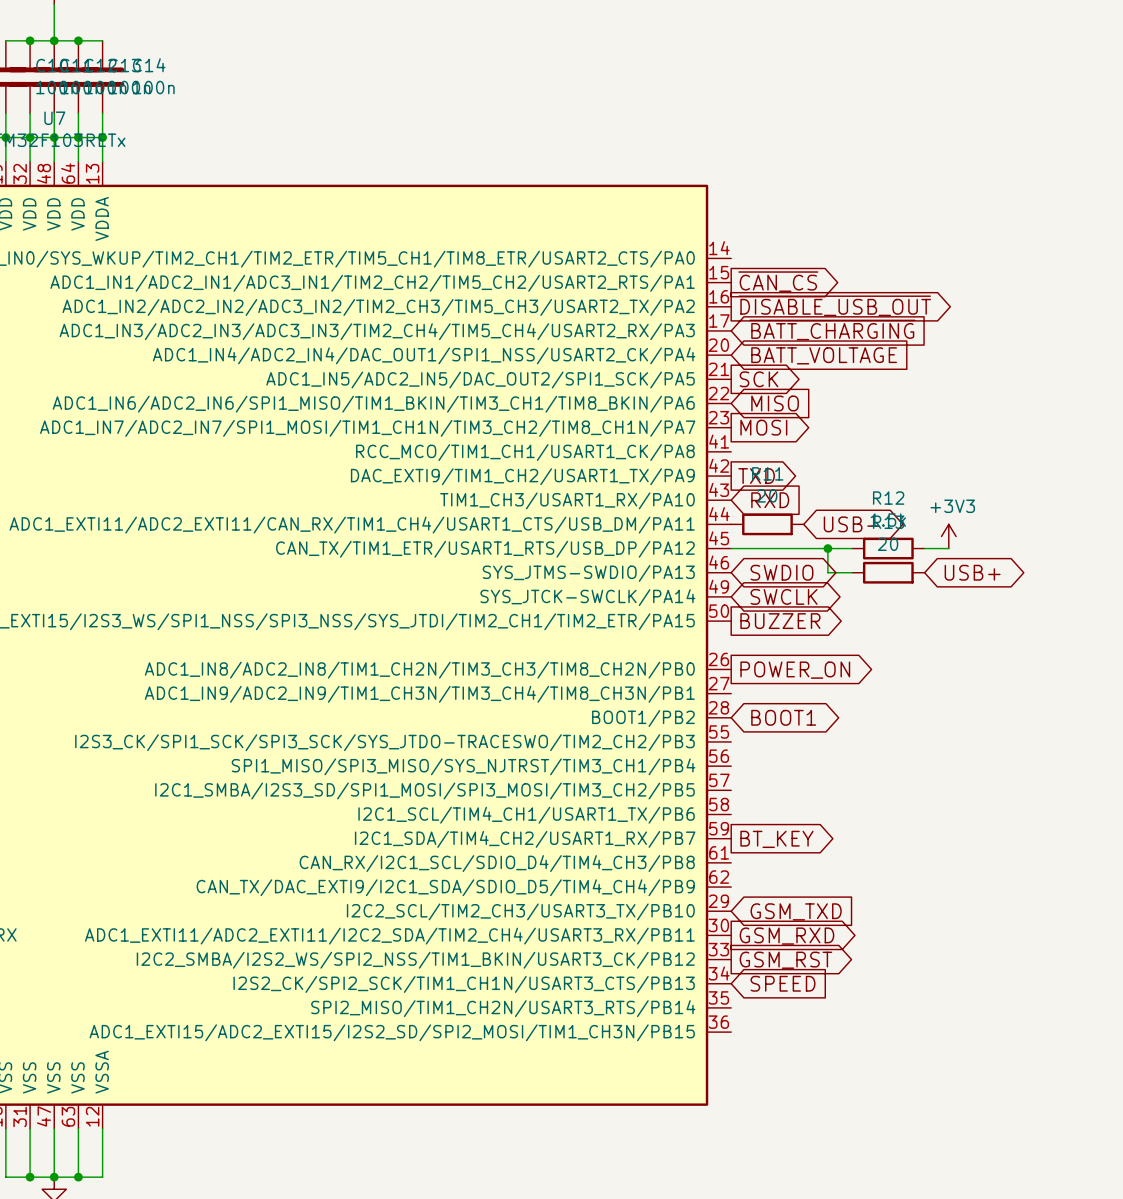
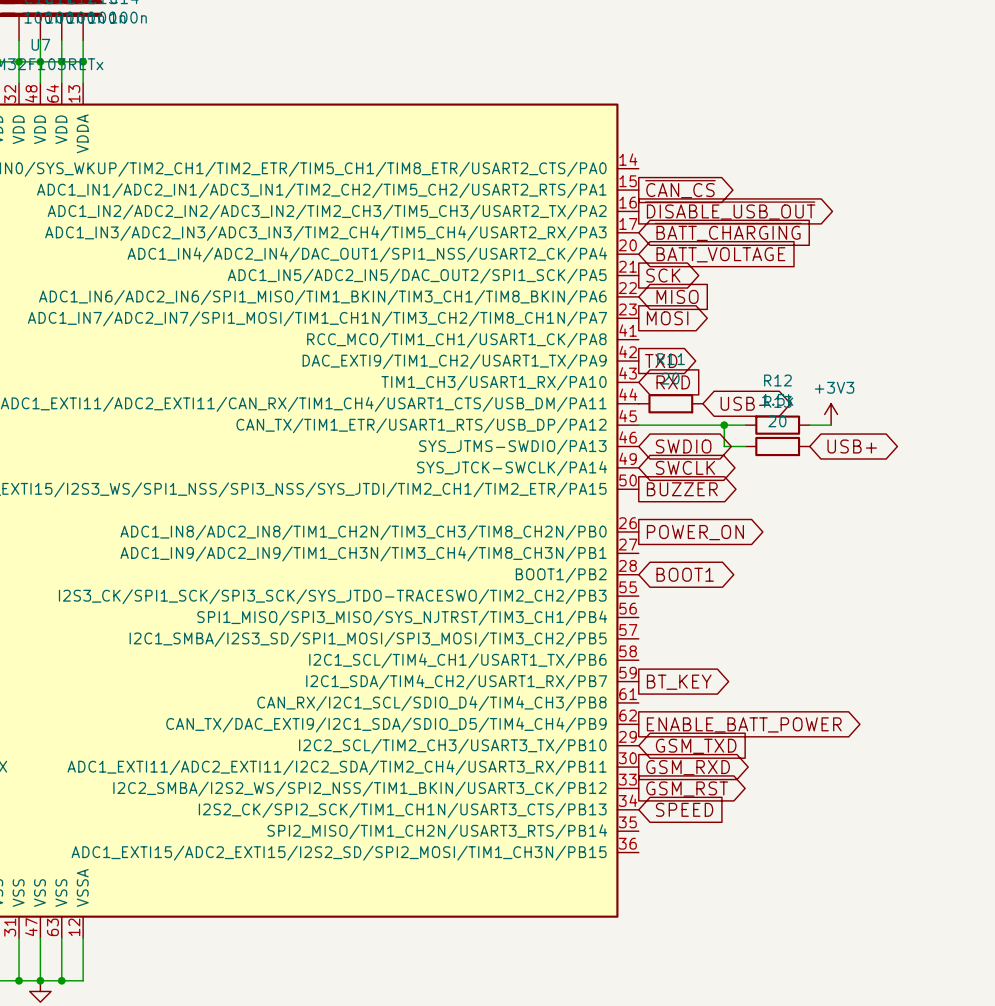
global label: none -> ENABLE_BATT_POWER (744, 724)

